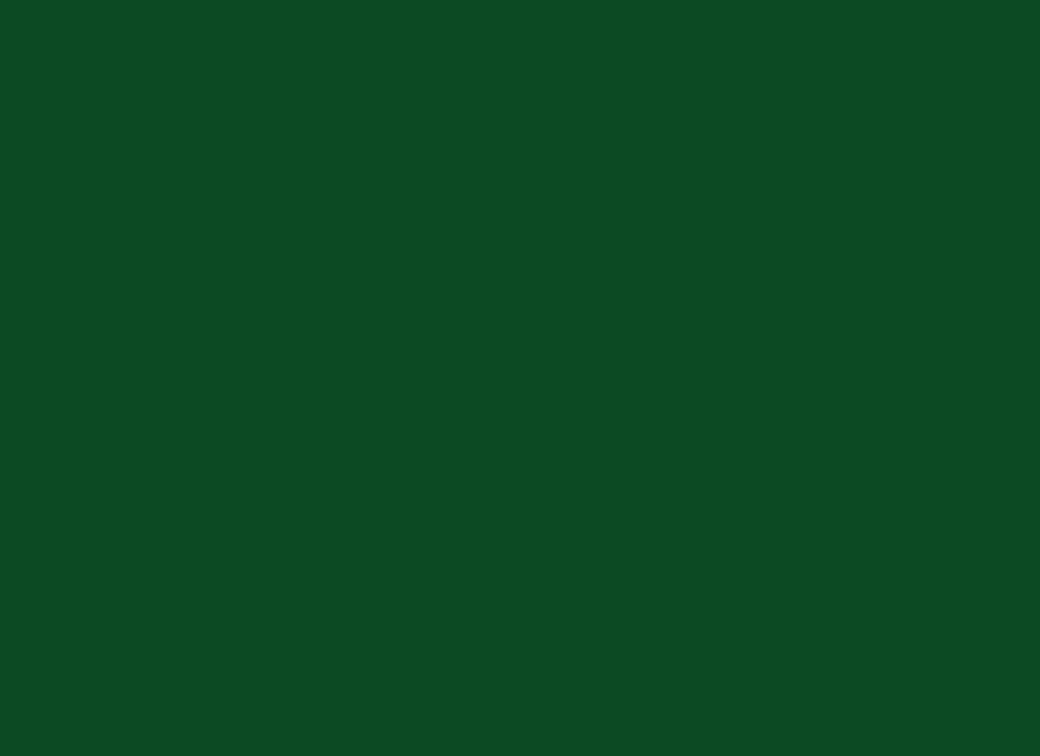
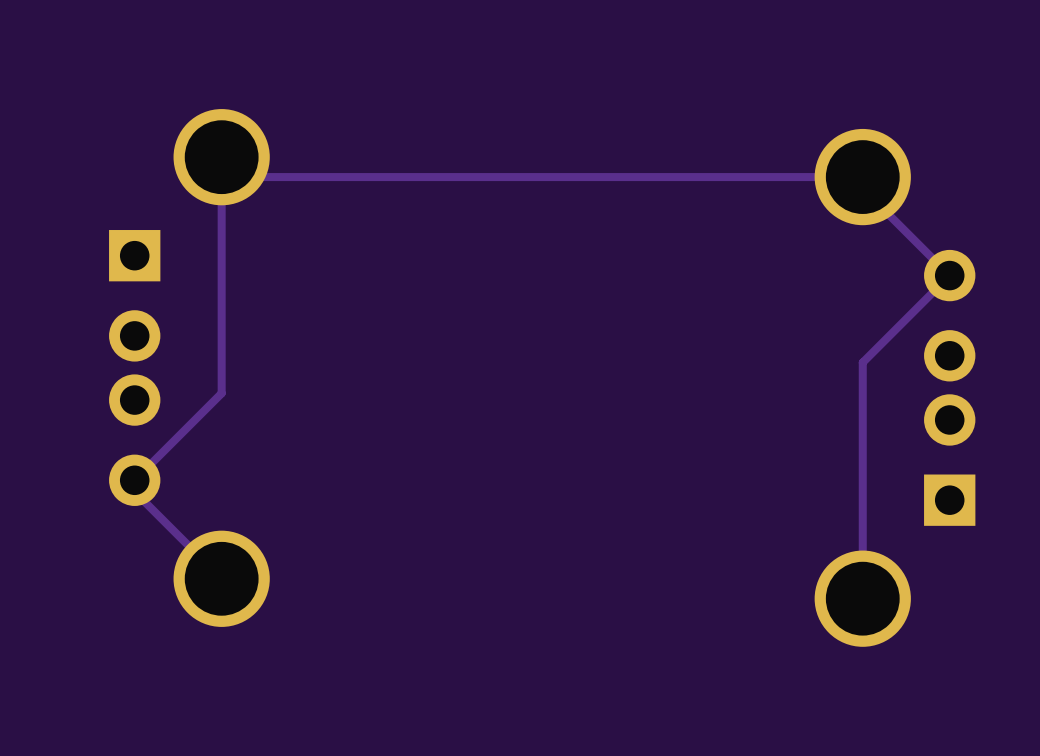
part: none -> (189, 367)
part: none -> (895, 387)
track: none -> (221, 578) (134, 491) (134, 480) (221, 393) (221, 157) (241, 177) (862, 177) (862, 188) (949, 275) (862, 362) (862, 598)

